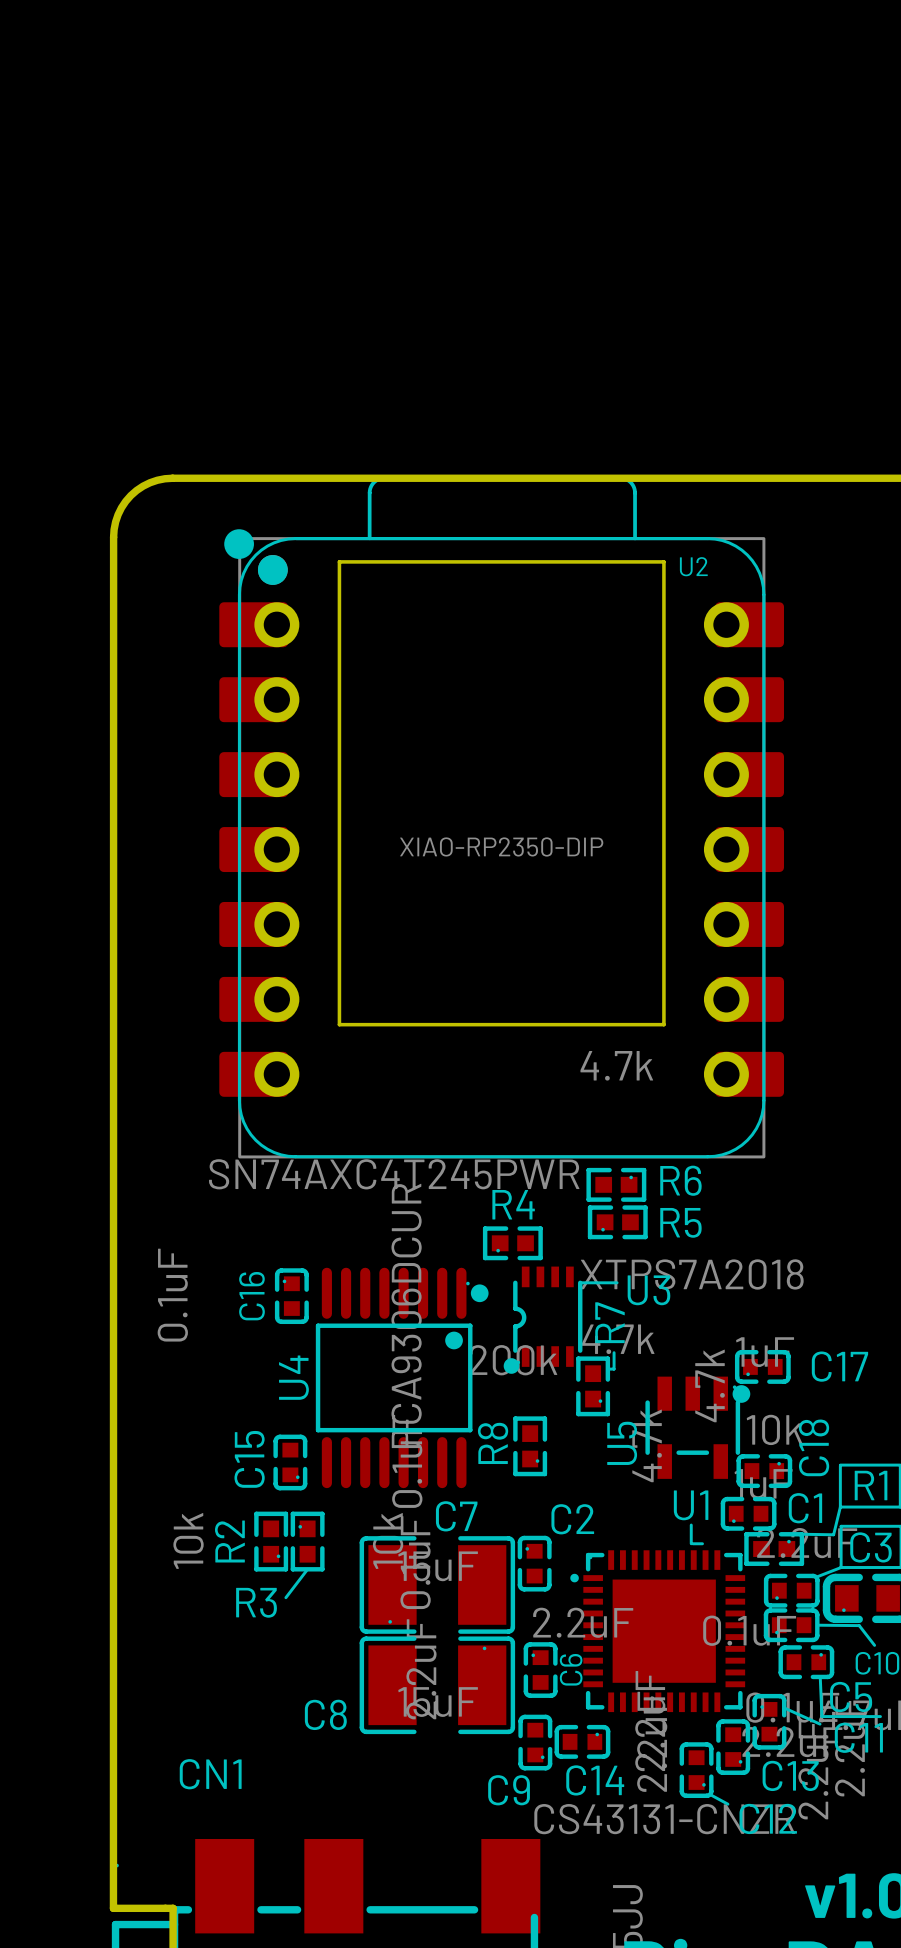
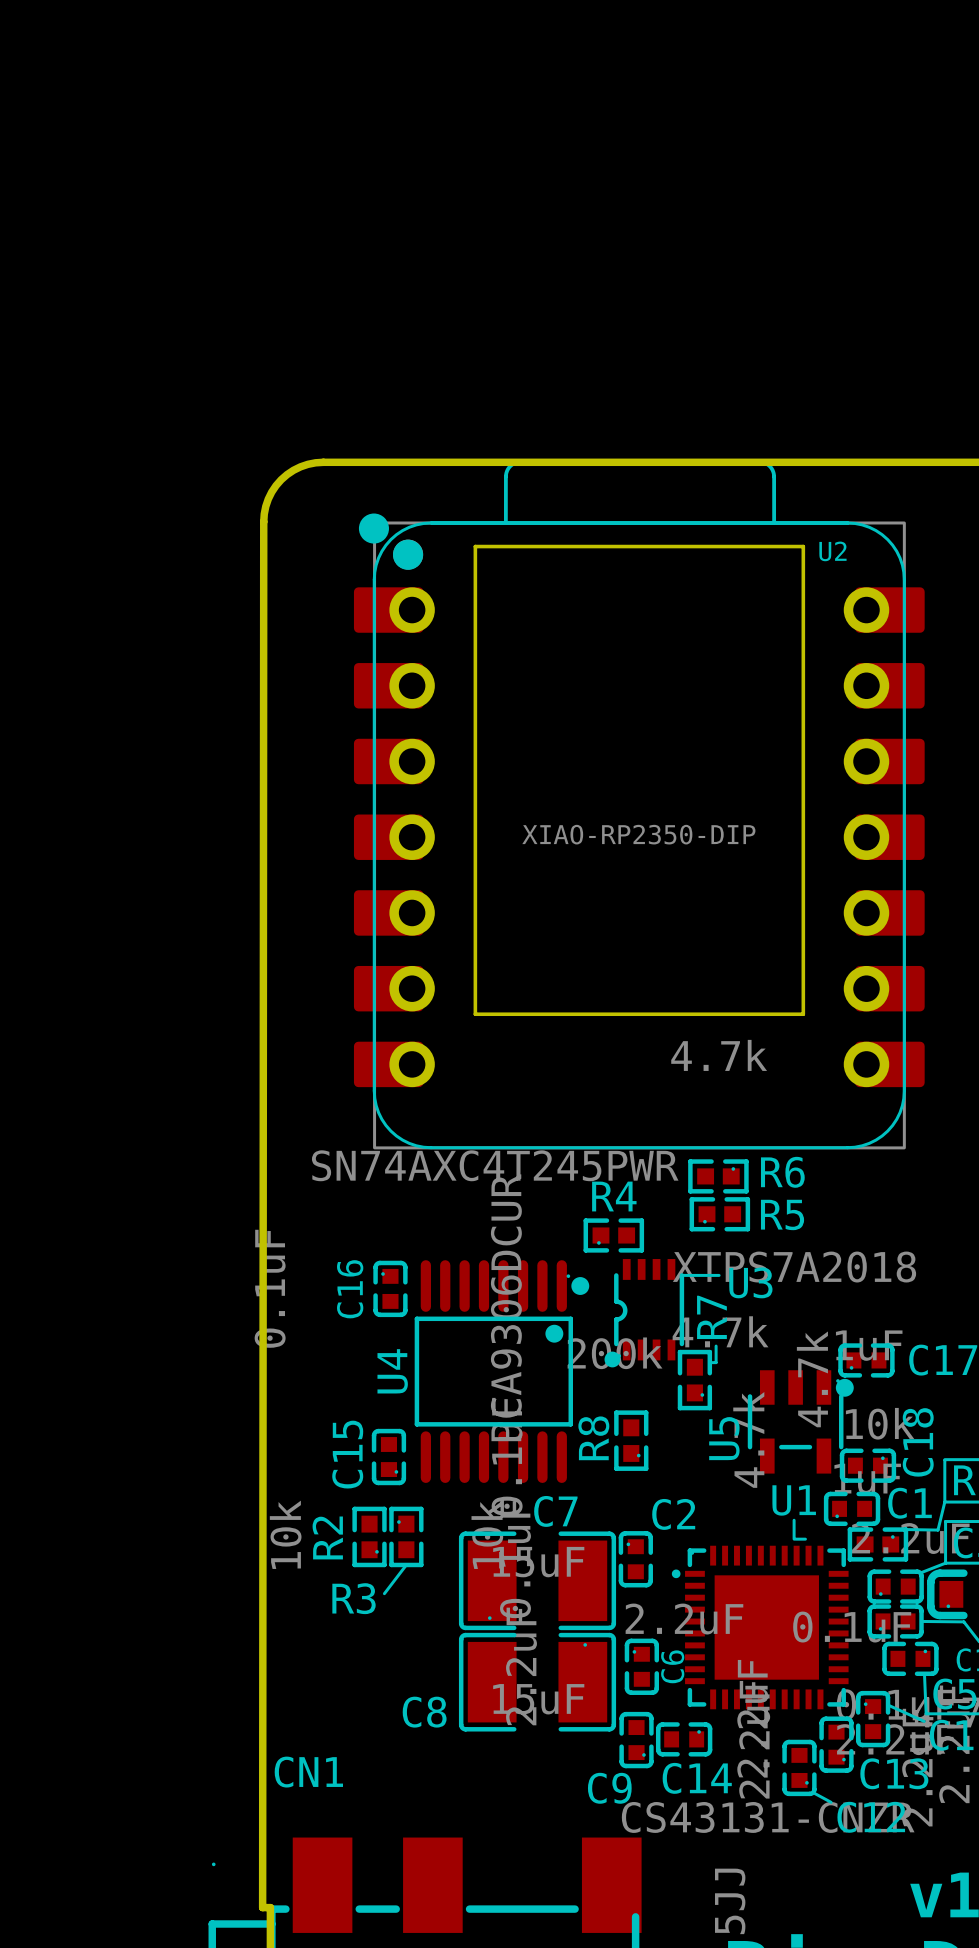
board edge: (225, 478) (164, 478) (143, 486) (130, 495) (121, 507) (115, 521) (113, 537) (113, 1908) (165, 1908) -> (323, 462) (300, 466) (281, 479) (268, 499) (263, 521) (262, 1907)
U2 position: (501, 817) -> (639, 804)

